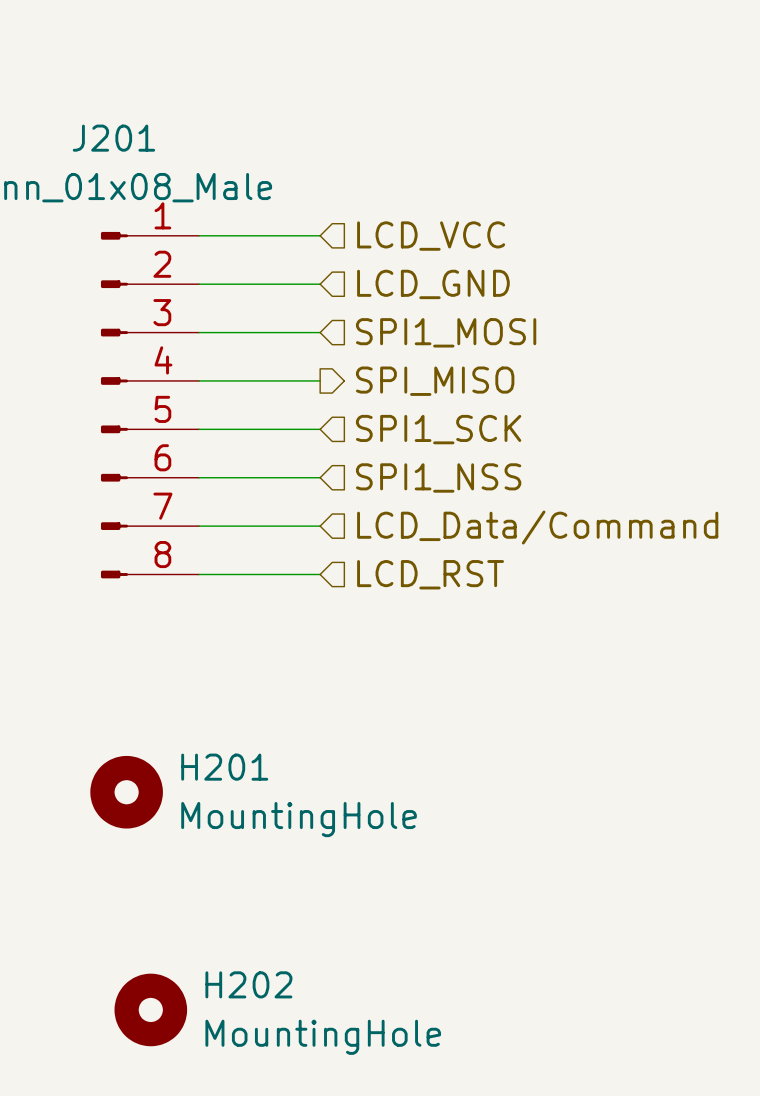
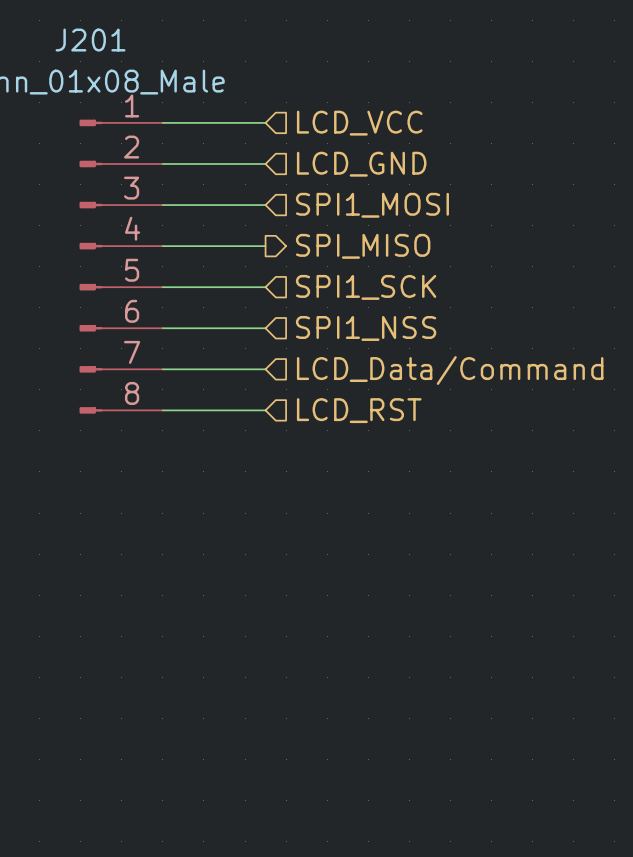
H201: MountingHole (126, 792) -> none
H202: MountingHole (150, 1009) -> none

